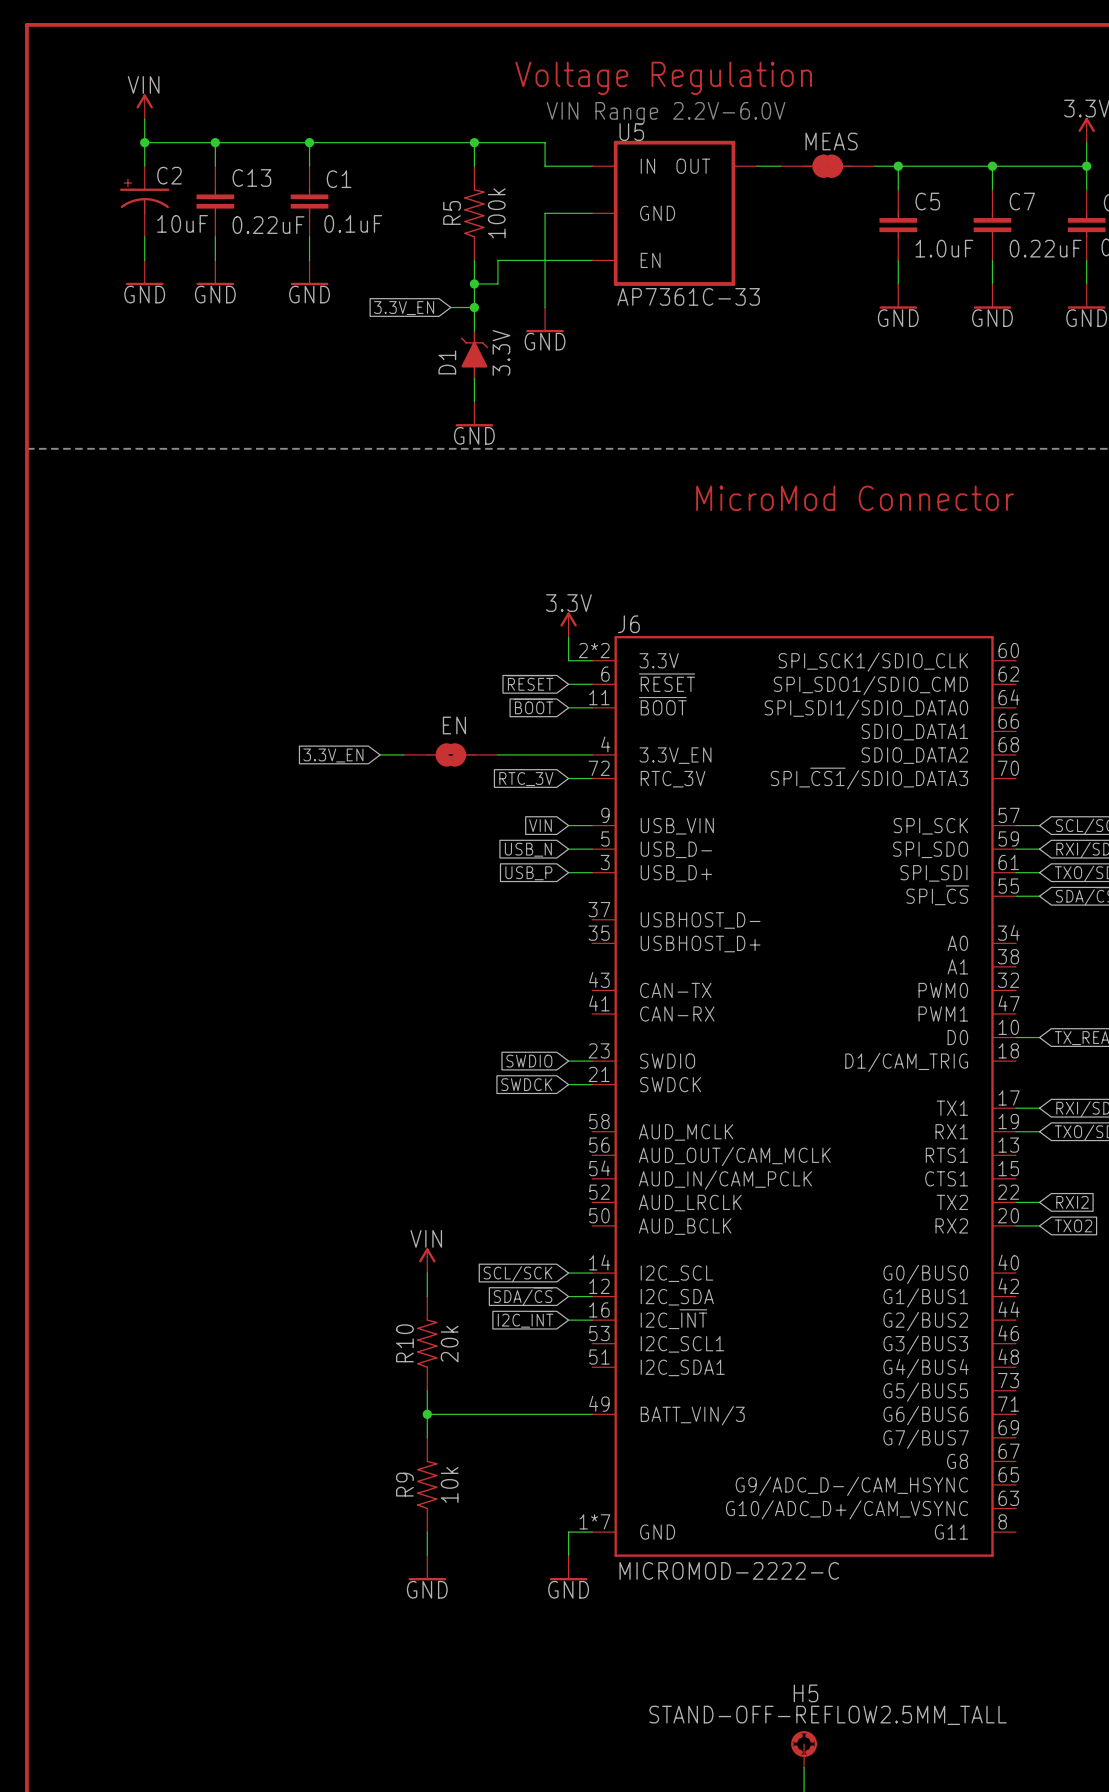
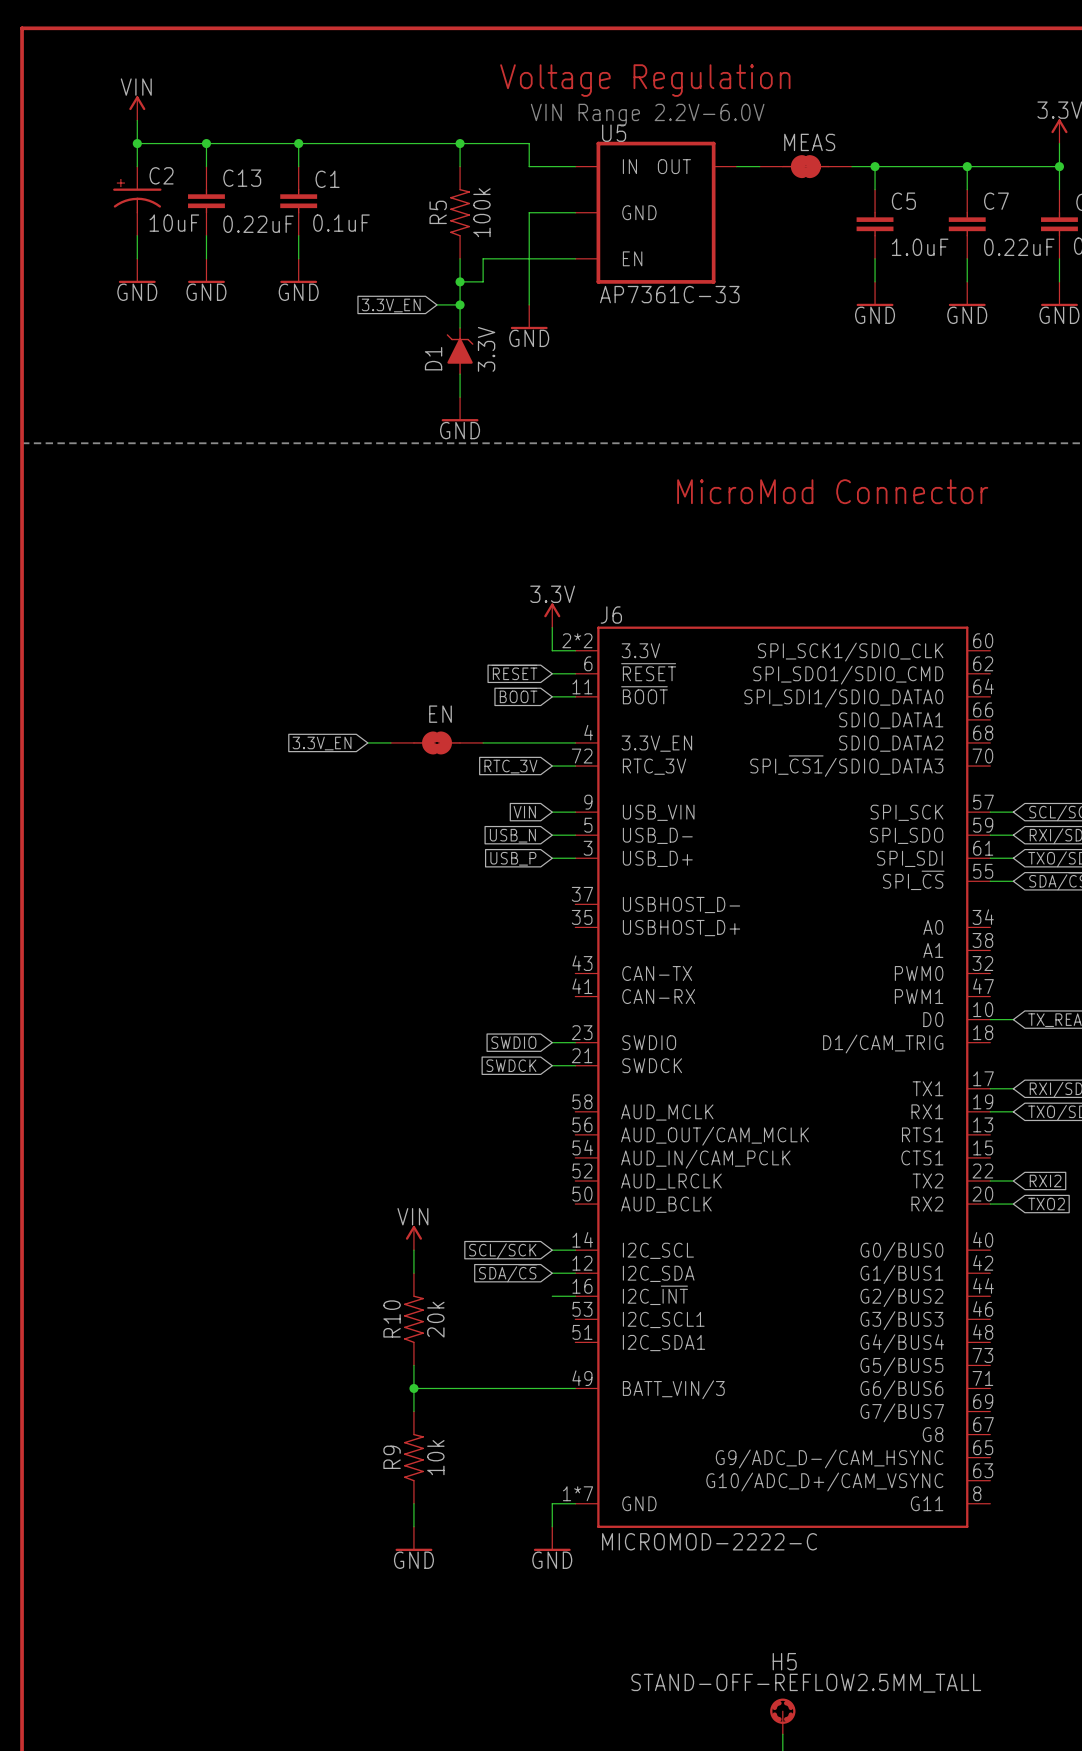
global label: I2C_~{INT} (525, 1319) -> none

